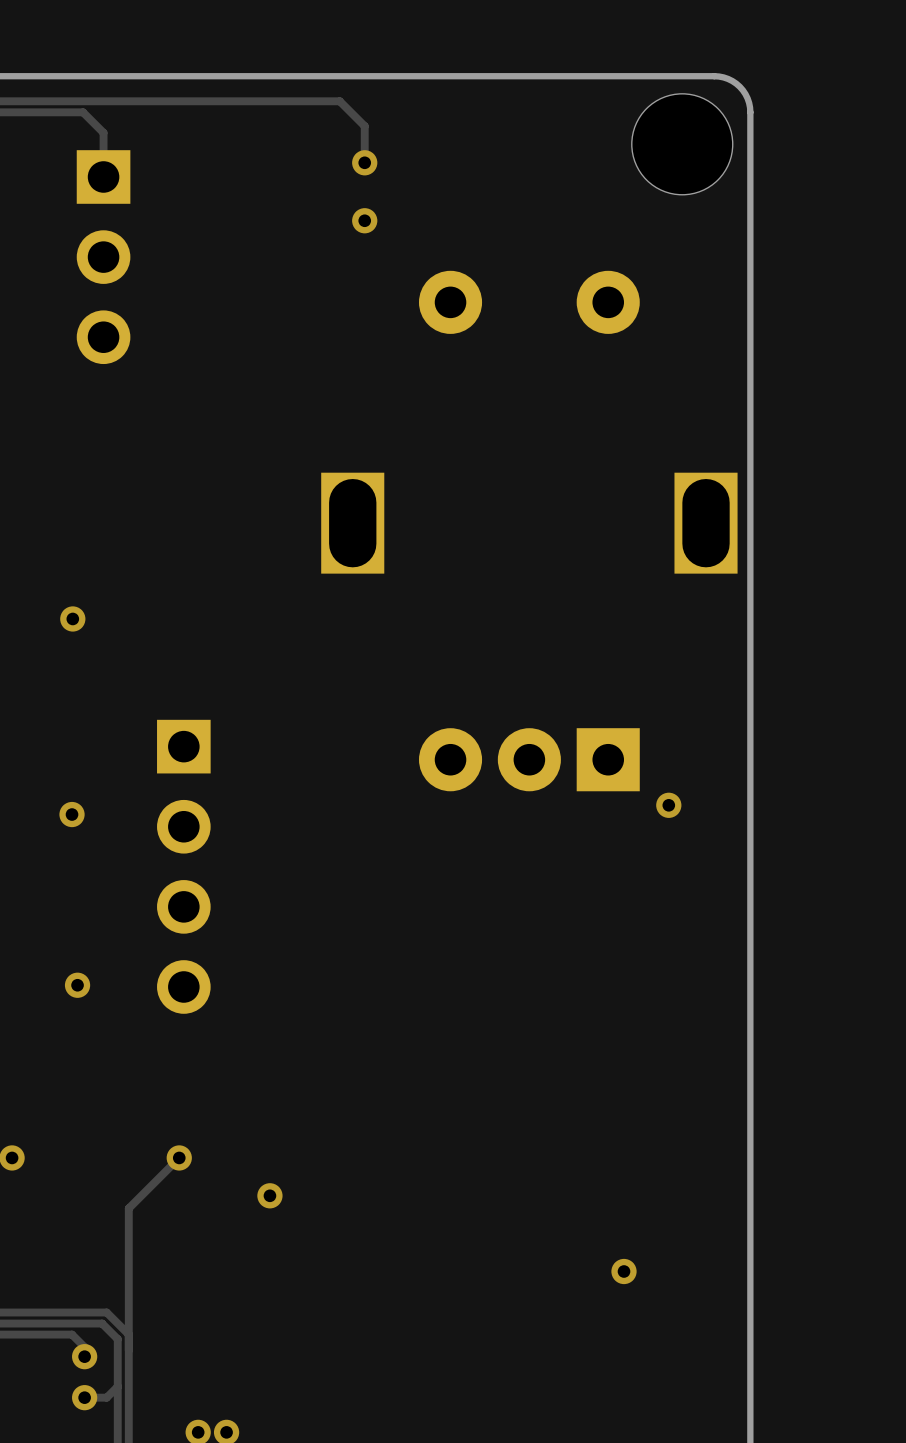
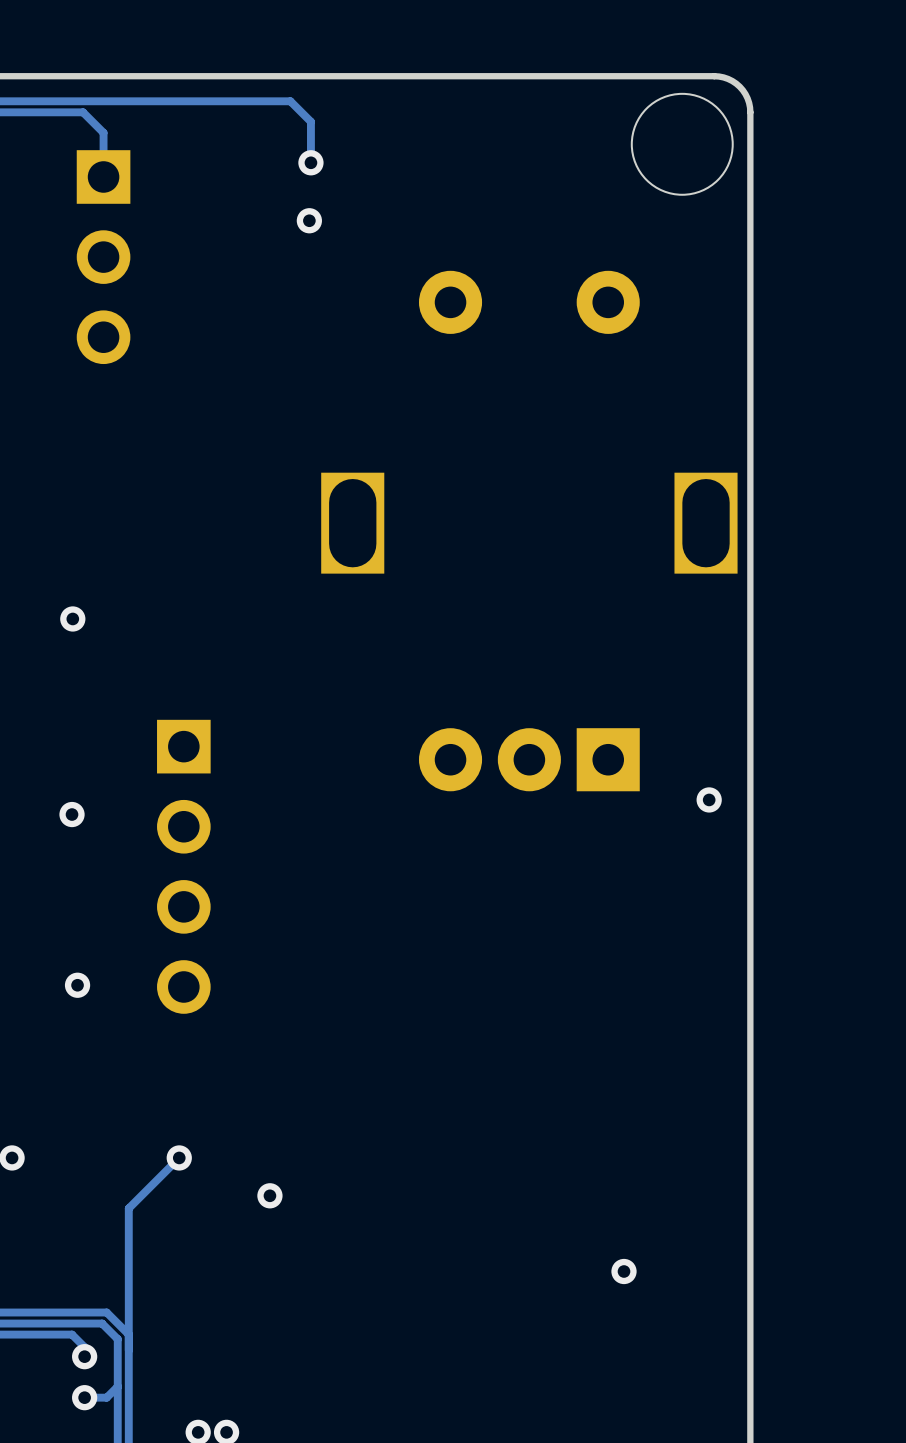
track: (290, 101) (339, 101) (364, 126) (364, 162) -> (290, 101) (310, 121) (310, 162)
via: none -> (310, 162)
via: (364, 162) -> none
via: none -> (309, 220)
via: (364, 220) -> none
via position: (668, 805) -> (709, 799)

